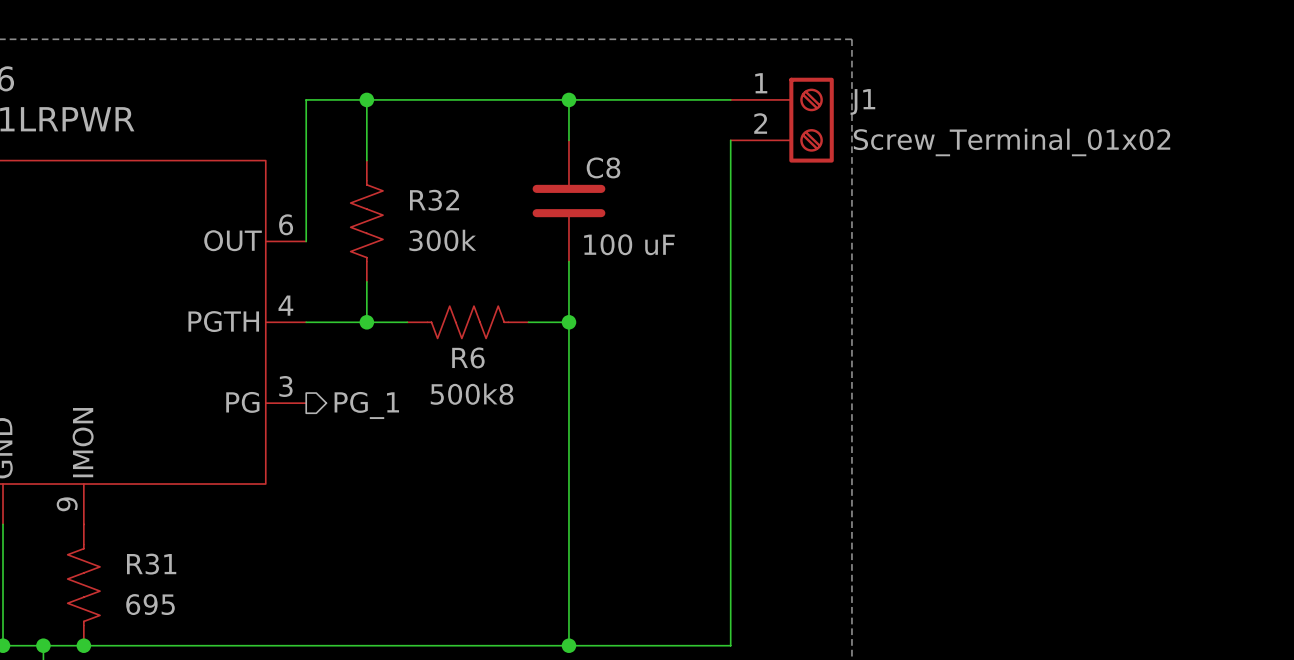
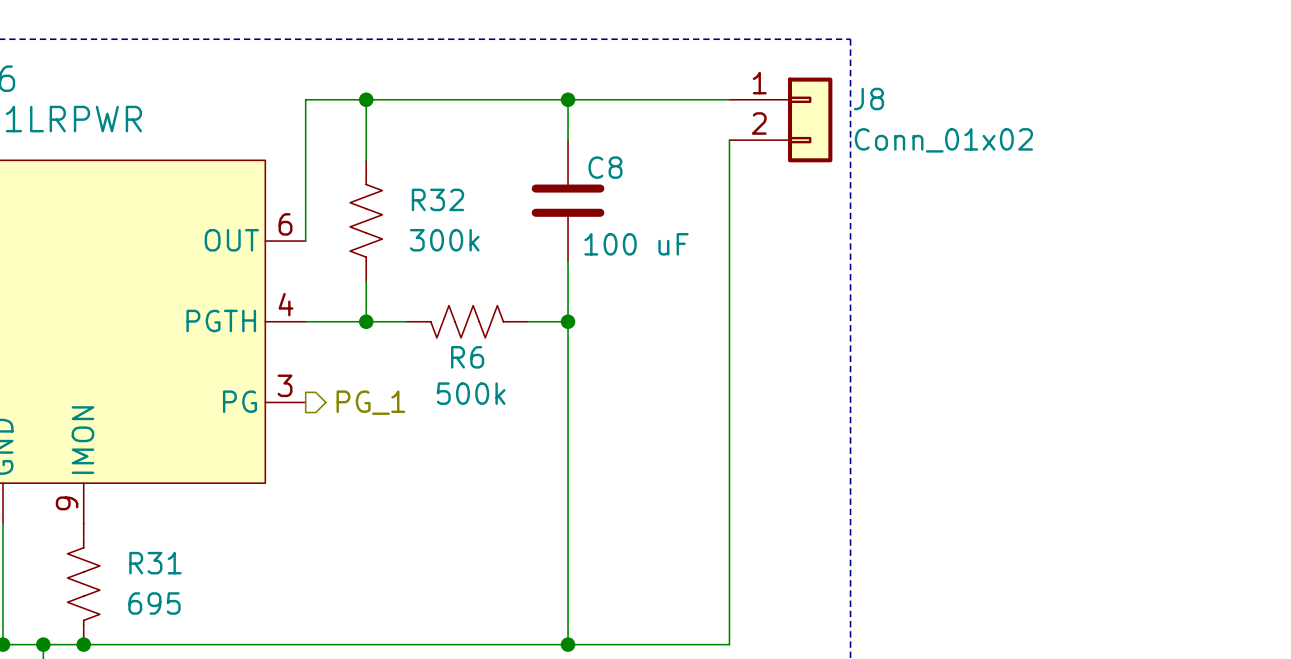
J1: Screw_Terminal_01x02 (782, 120) -> none
J8: none -> Conn_01x02 (780, 119)
500k8 name: 500k8 (472, 394) -> 500k (471, 393)

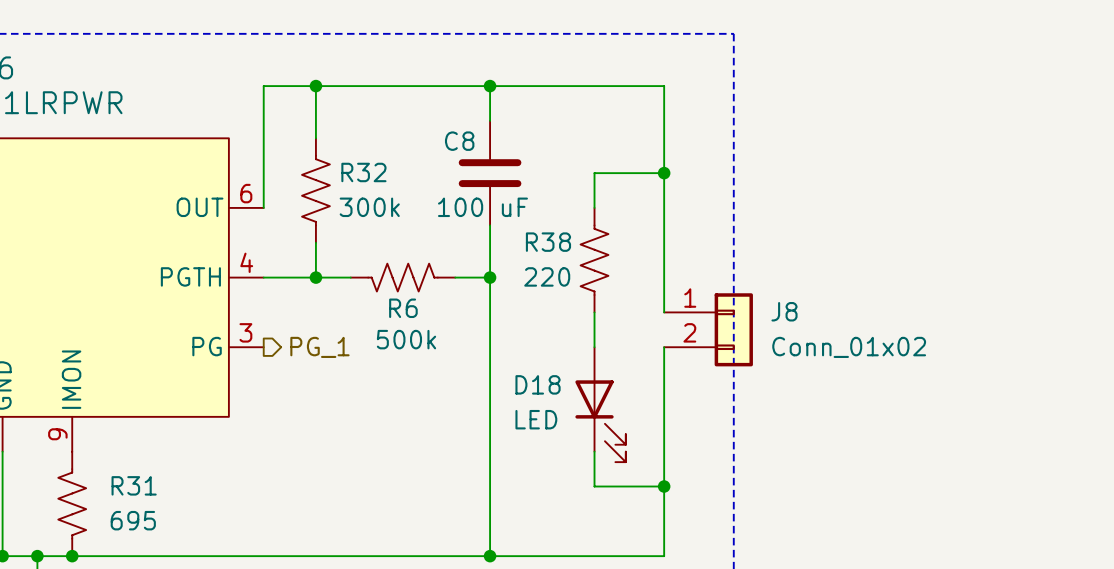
wire: none -> (629, 86) (664, 86) (664, 312)
J8 position: (780, 119) -> (708, 329)
wire: (729, 140) (729, 644) -> (664, 347) (664, 556) (629, 556)
C8 name position: C8 (605, 167) -> C8 (459, 141)
R32 name position: R32 (437, 199) -> R32 (363, 172)
wire: none -> (664, 173) (594, 173) (594, 207)
junction: none -> (664, 173)
R32 value position: 300k (444, 240) -> 300k (369, 207)
C8 value position: 100 uF (636, 244) -> 100 uF (482, 207)
R38: none -> 220 (594, 260)
wire: none -> (594, 312) (594, 347)
D18: none -> LED (600, 404)
wire: none -> (594, 451) (594, 486) (664, 486)
junction: none -> (664, 486)

